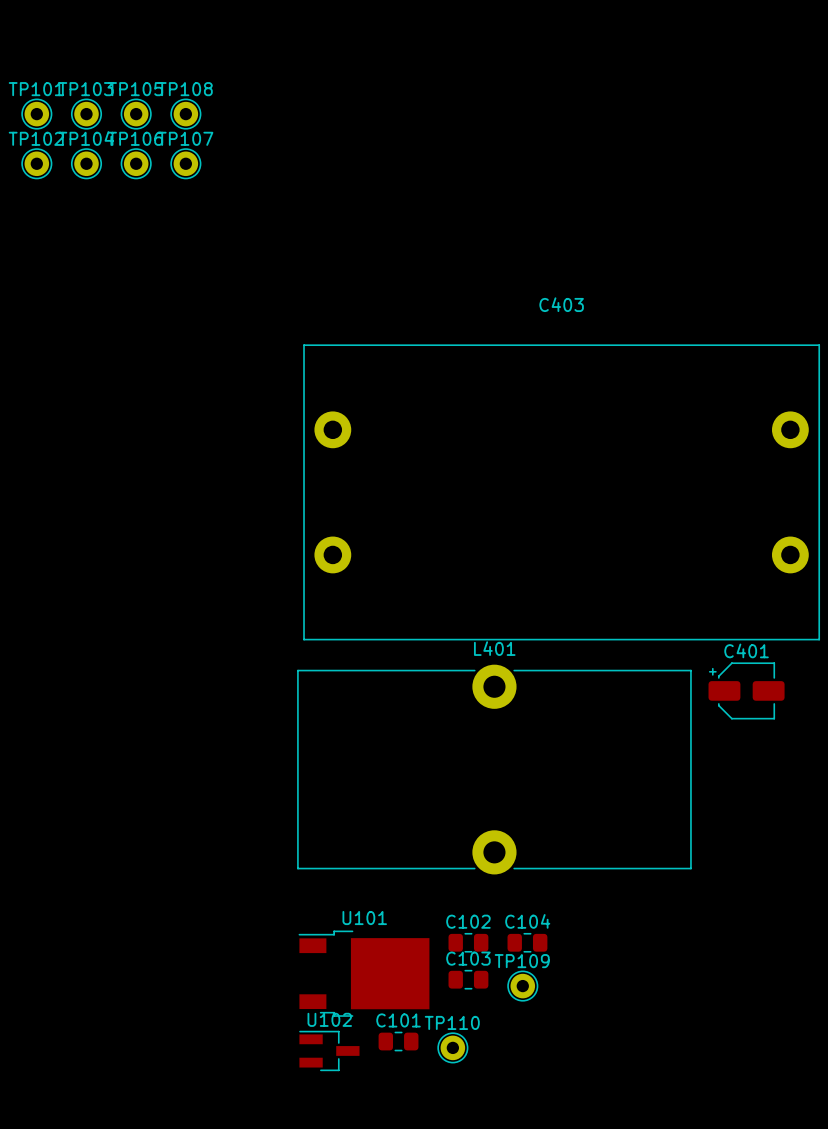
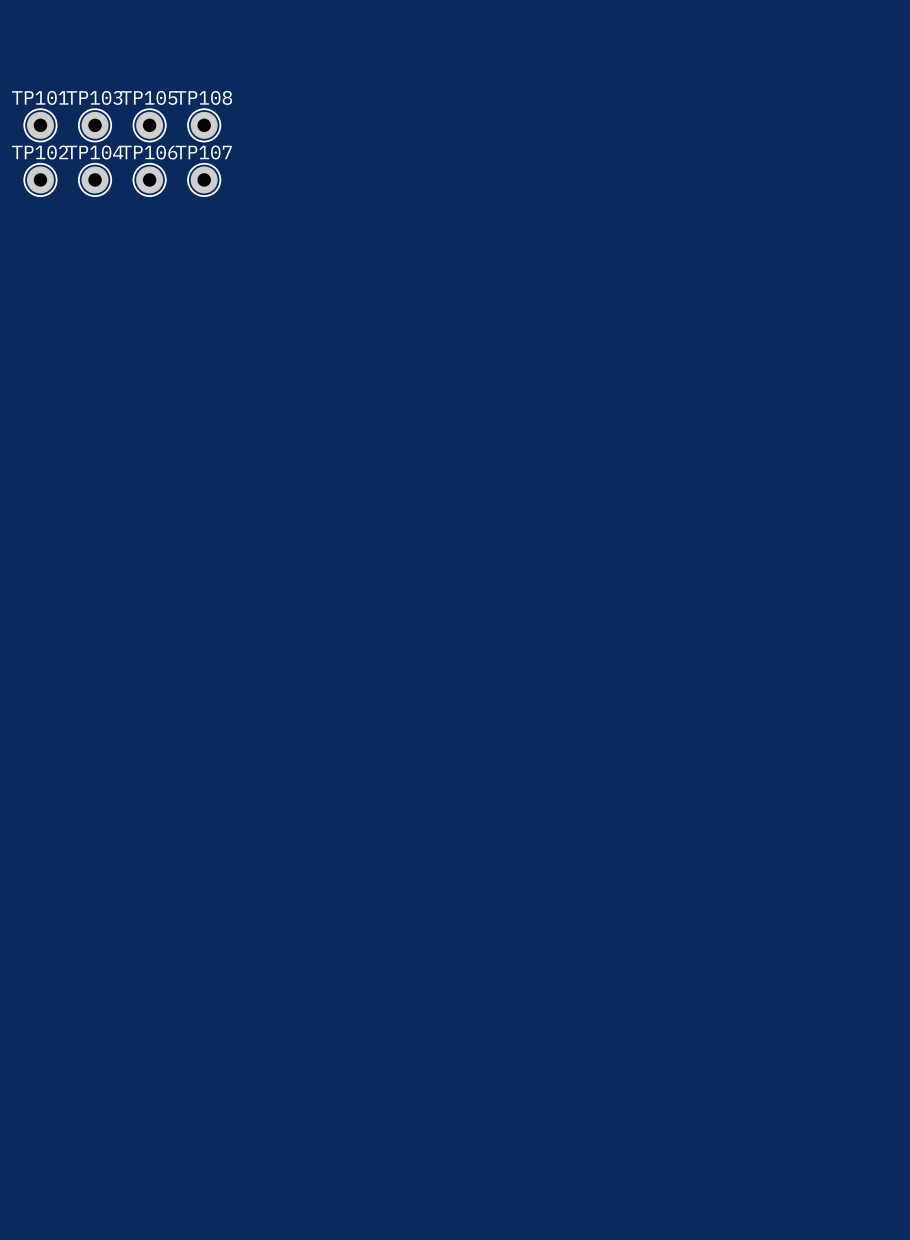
C403: (561, 492) -> none
C401: (746, 690) -> none
L401: (494, 769) -> none
C102: (468, 942) -> none
C104: (527, 942) -> none
U101: (364, 973) -> none
C103: (468, 979) -> none
TP109: (522, 986) -> none
C101: (398, 1041) -> none
TP110: (452, 1047) -> none
U102: (329, 1050) -> none

